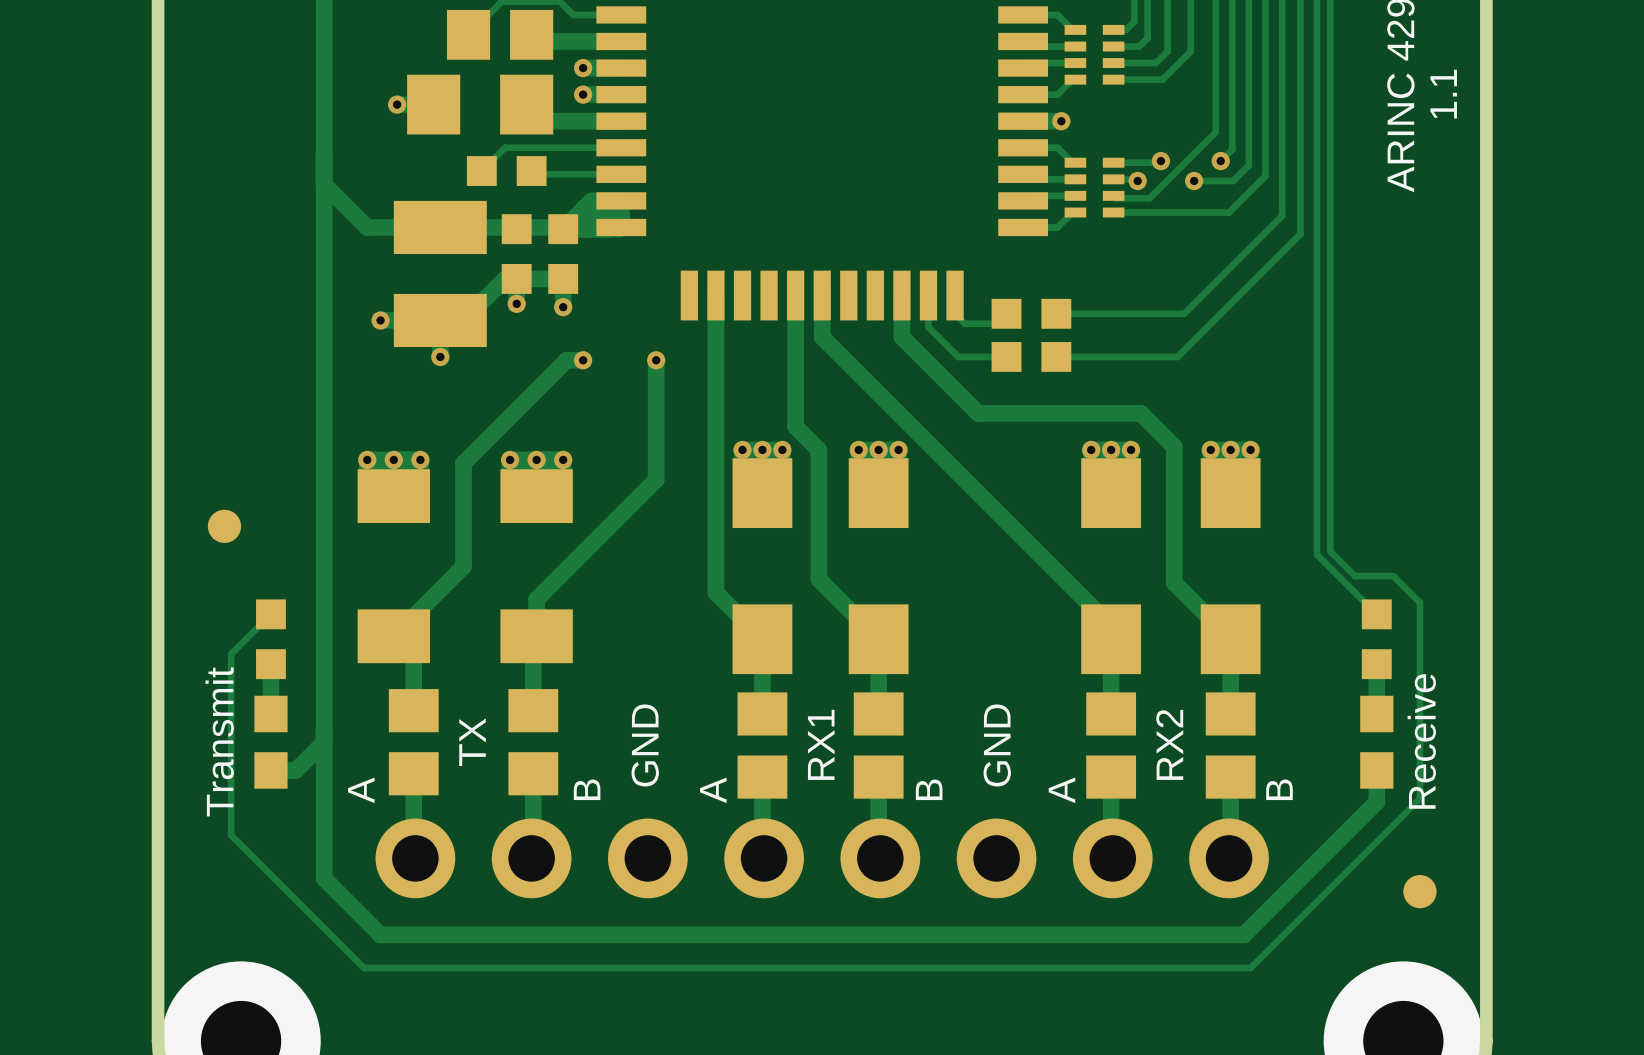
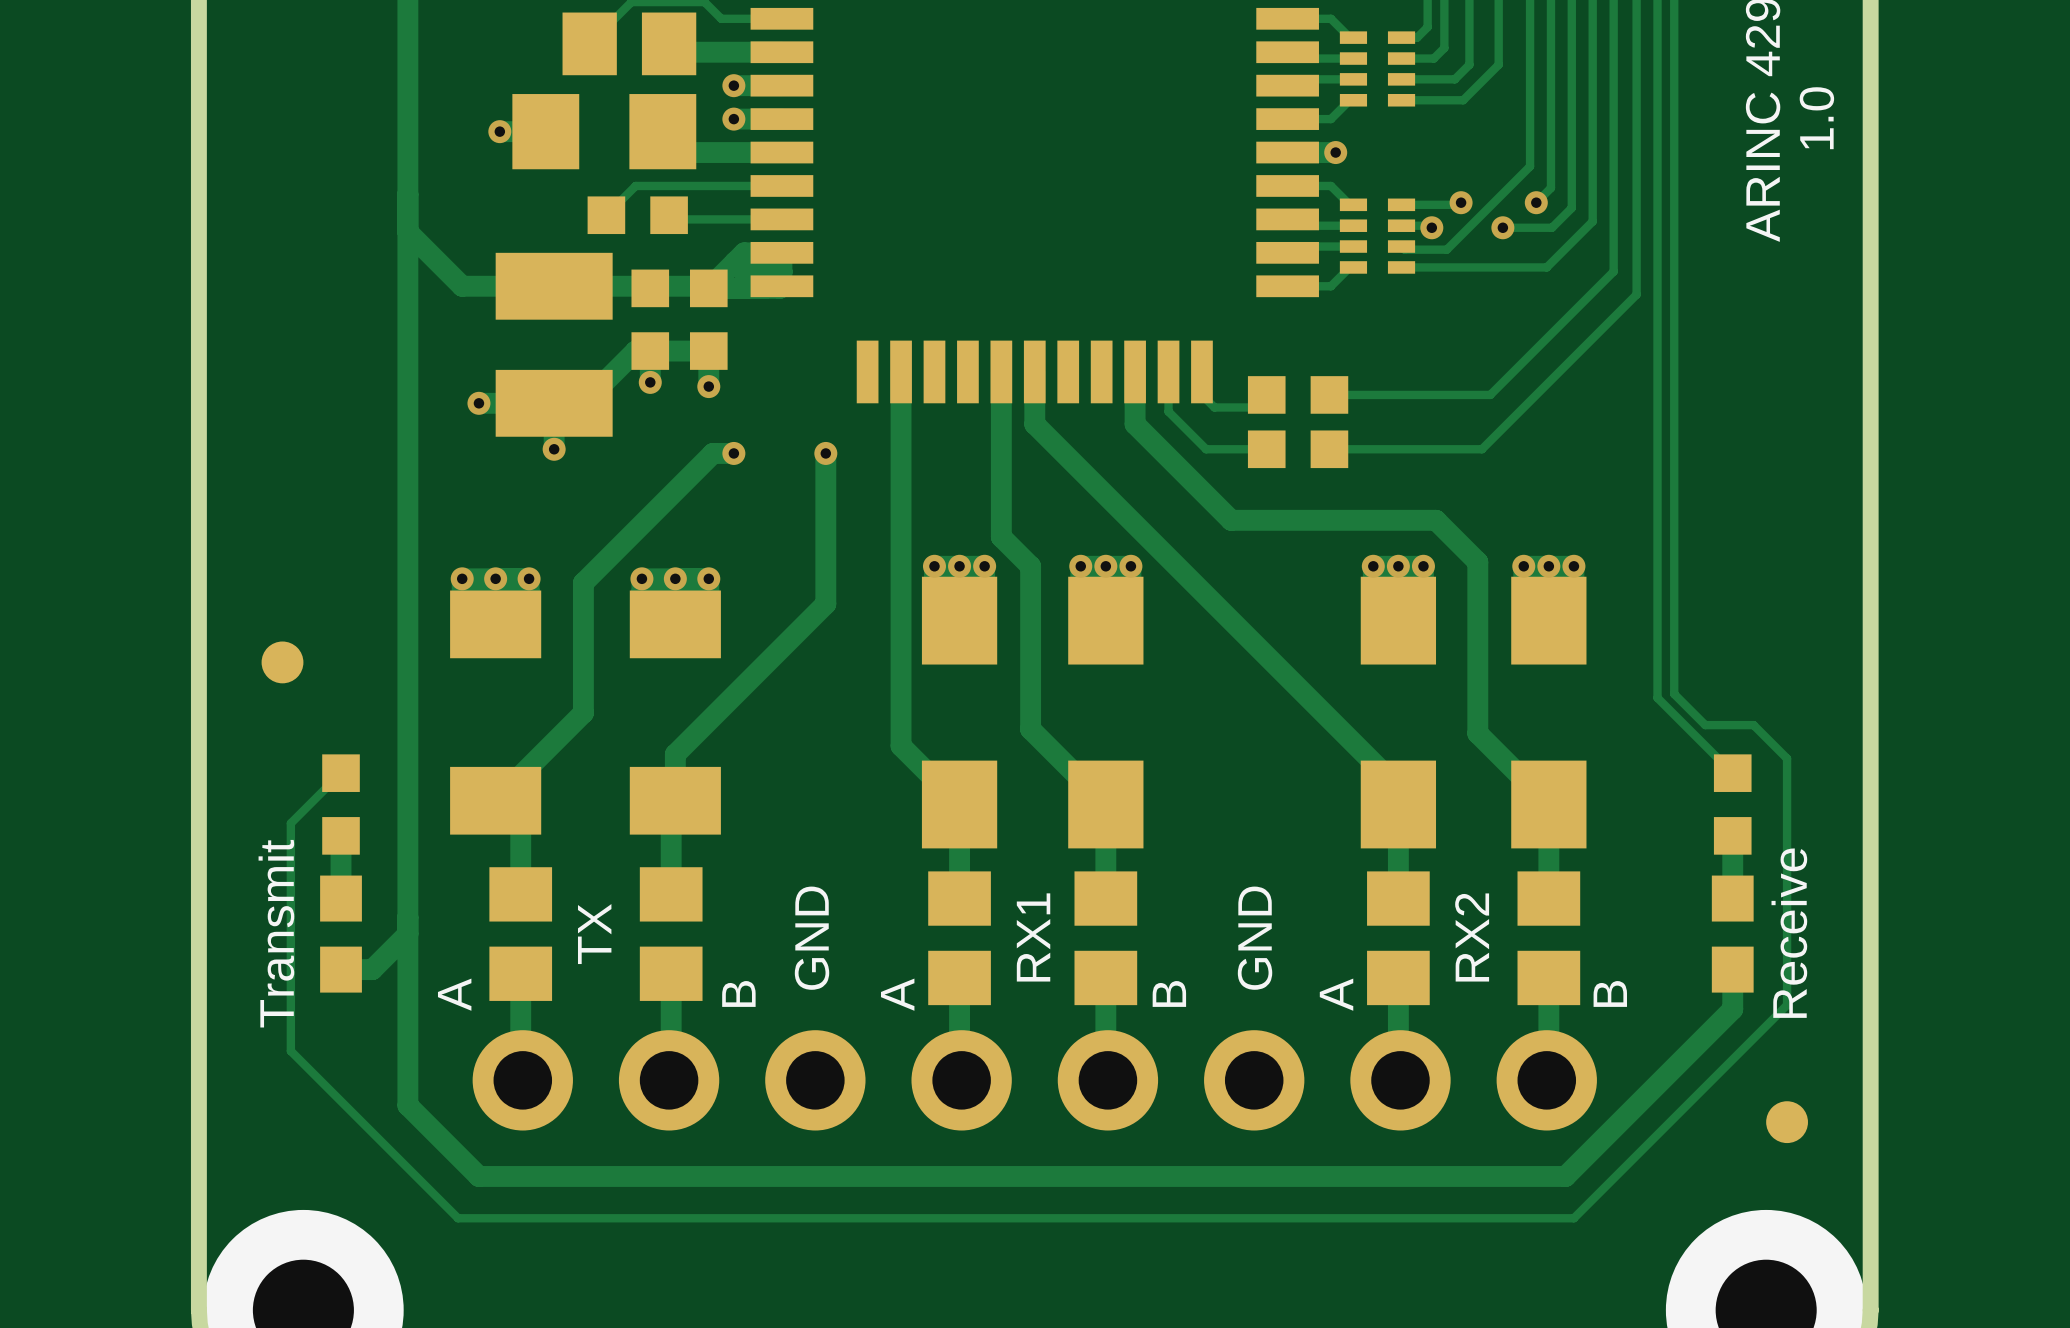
text: 1.1 (1443, 94) -> 1.0 (1816, 118)

